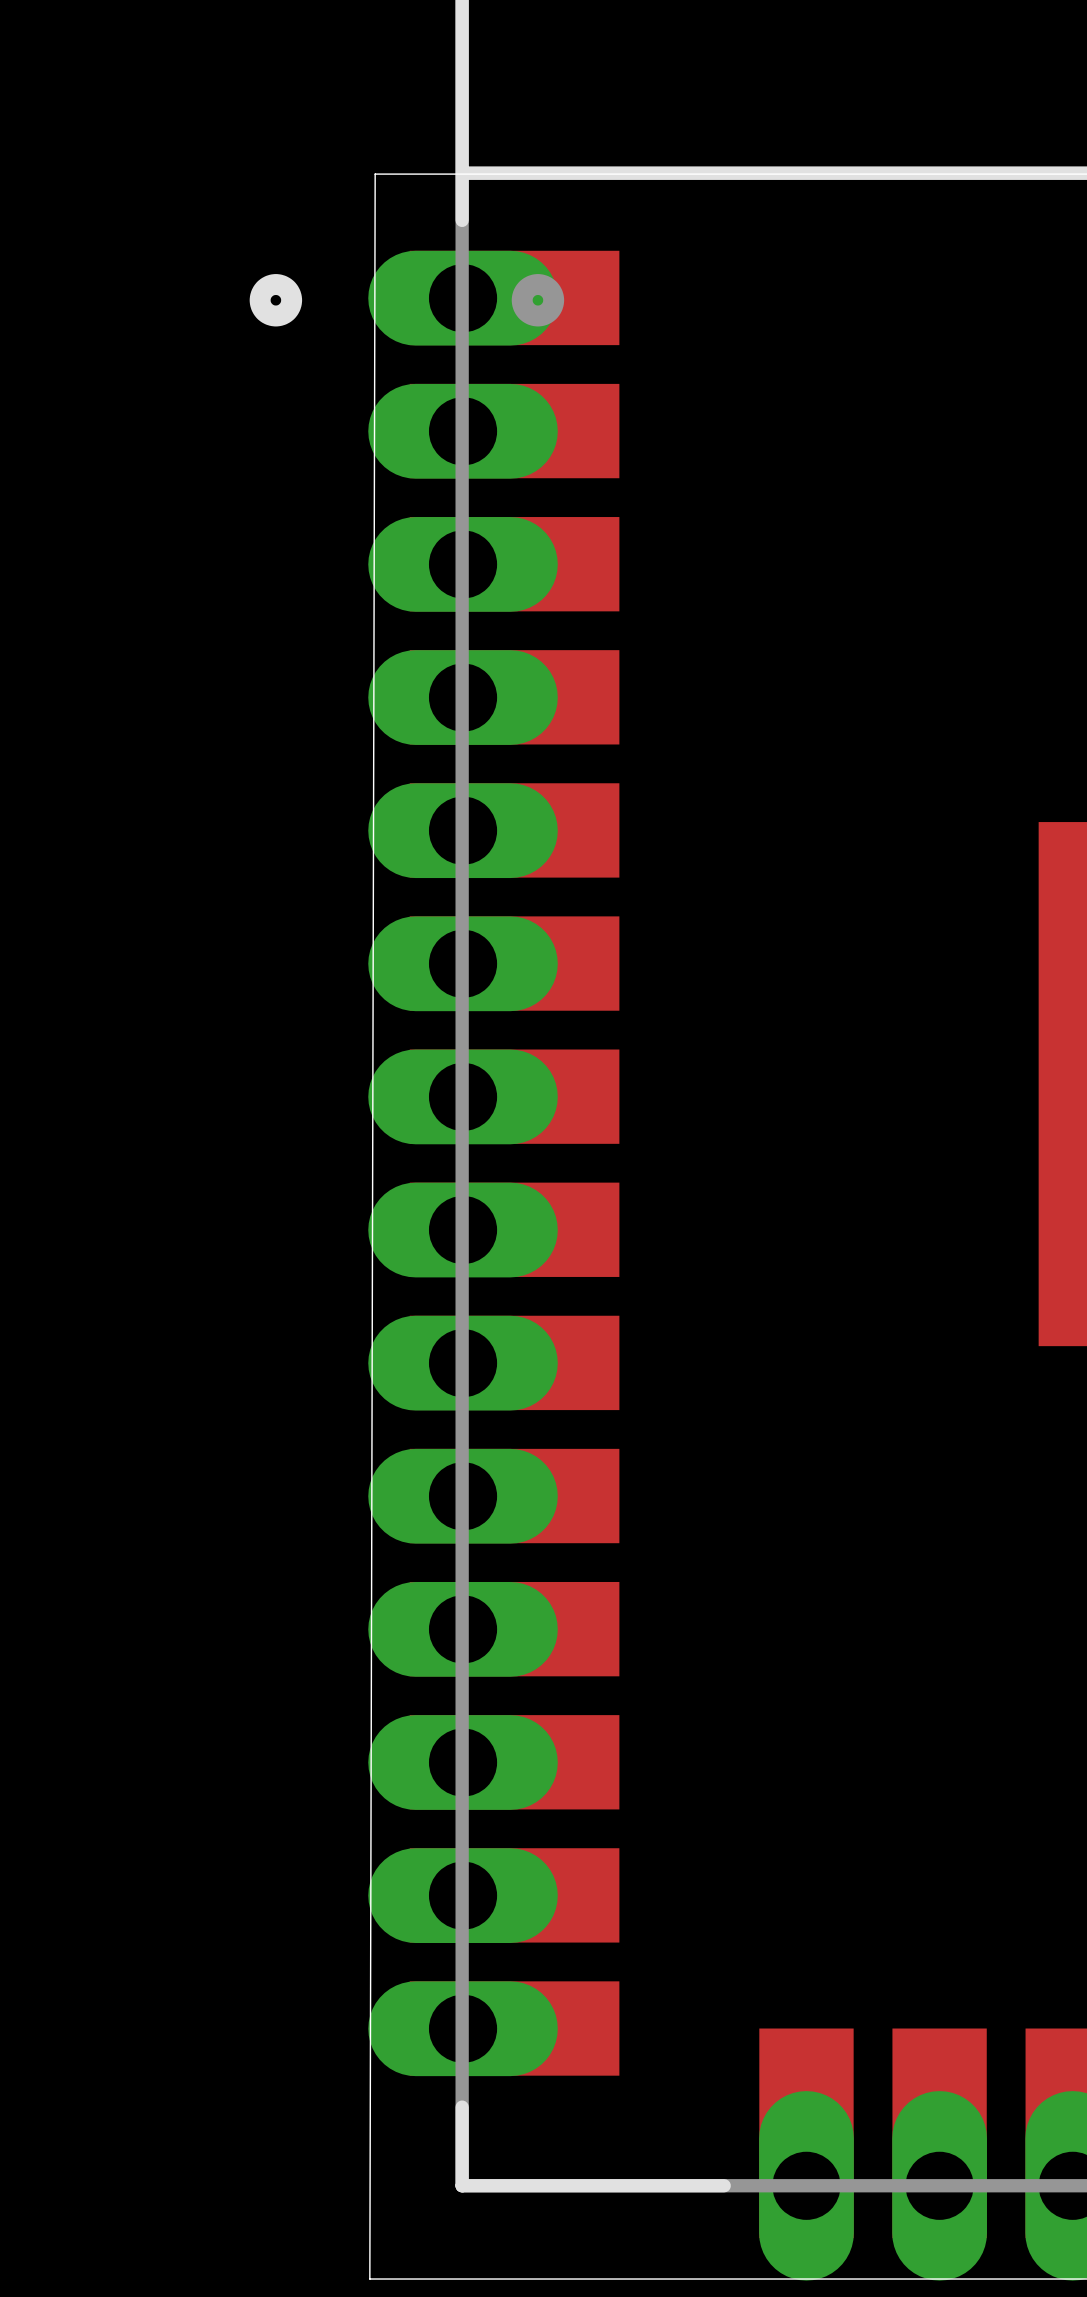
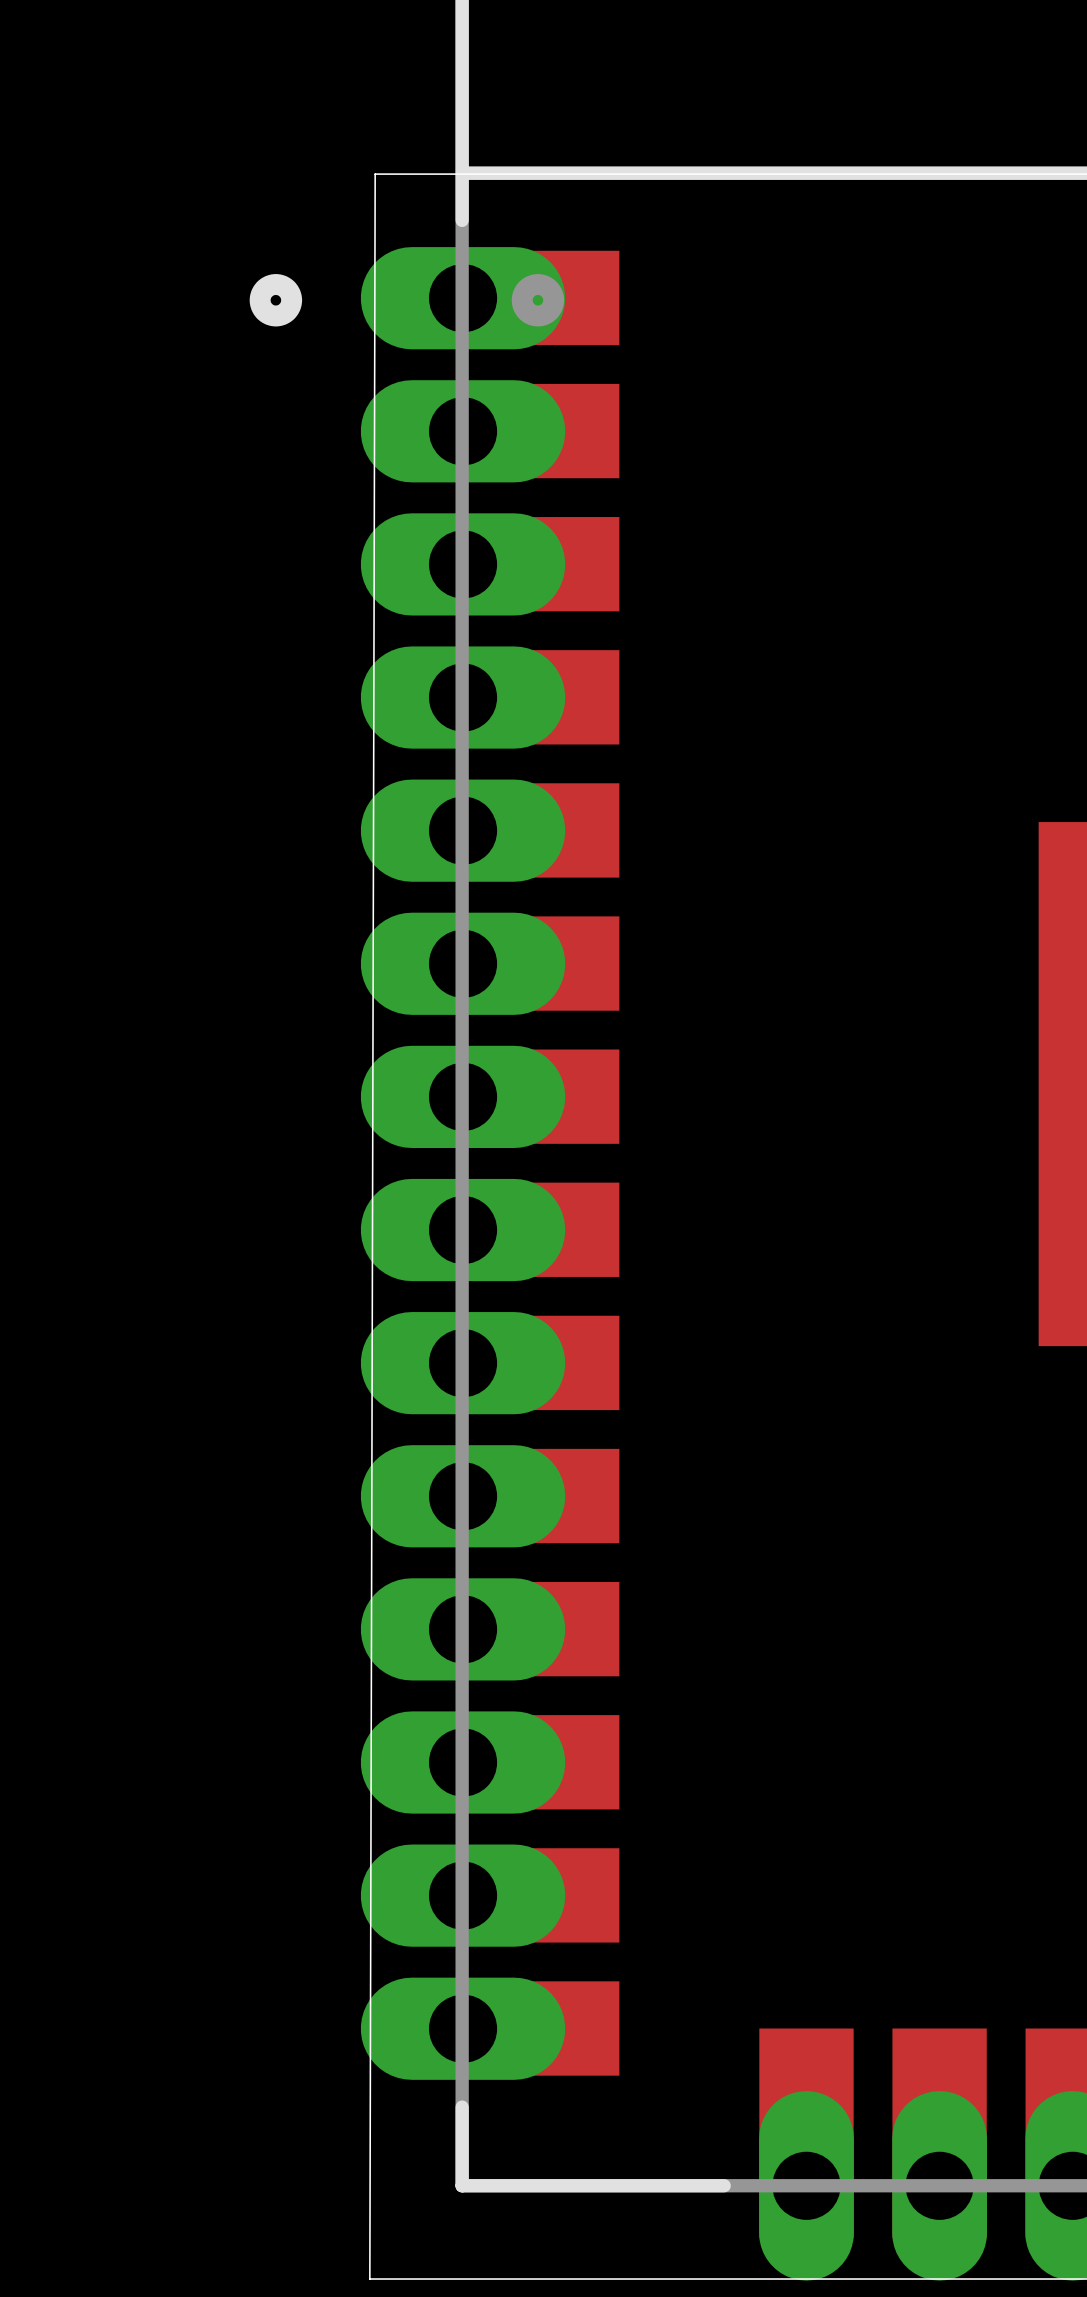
part footprint: [368, 250, 558, 2077] -> [360, 247, 566, 2080]

